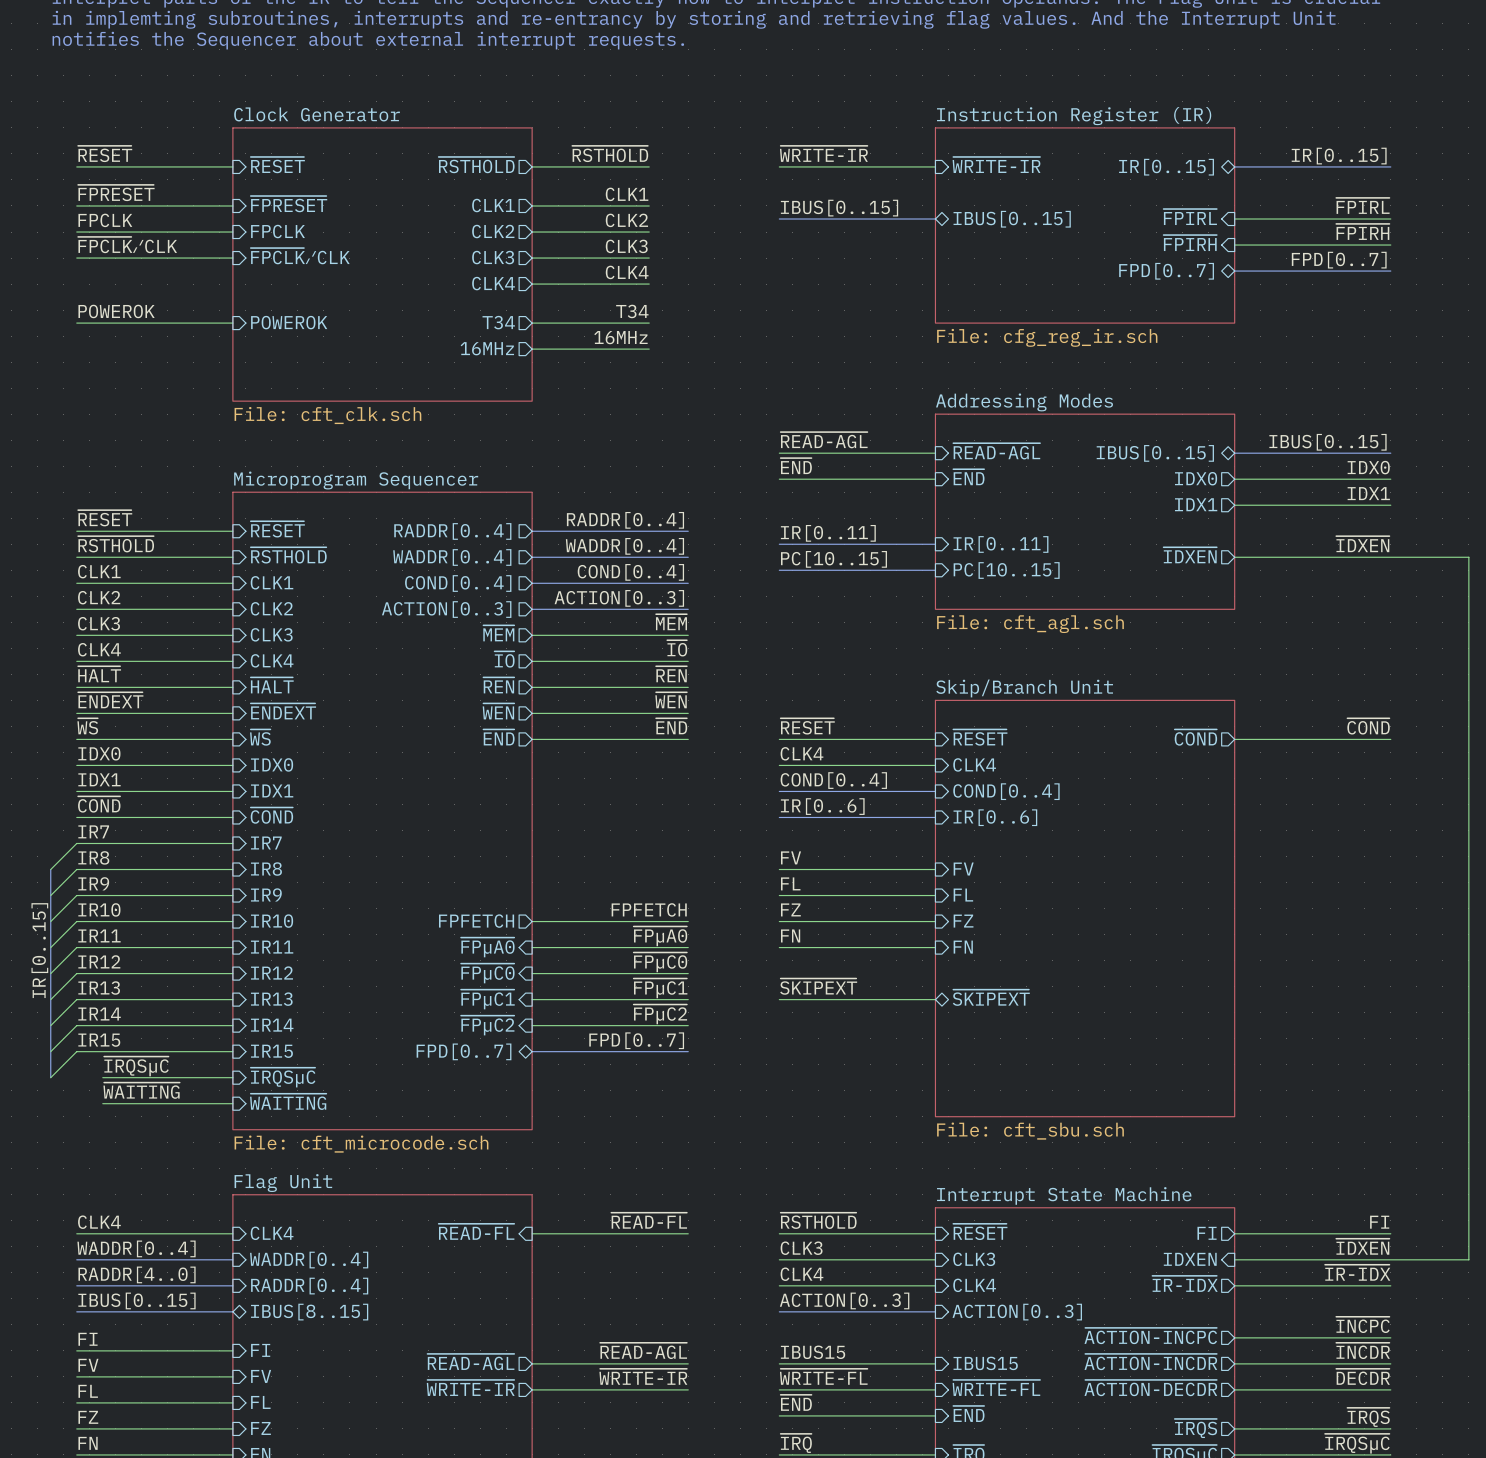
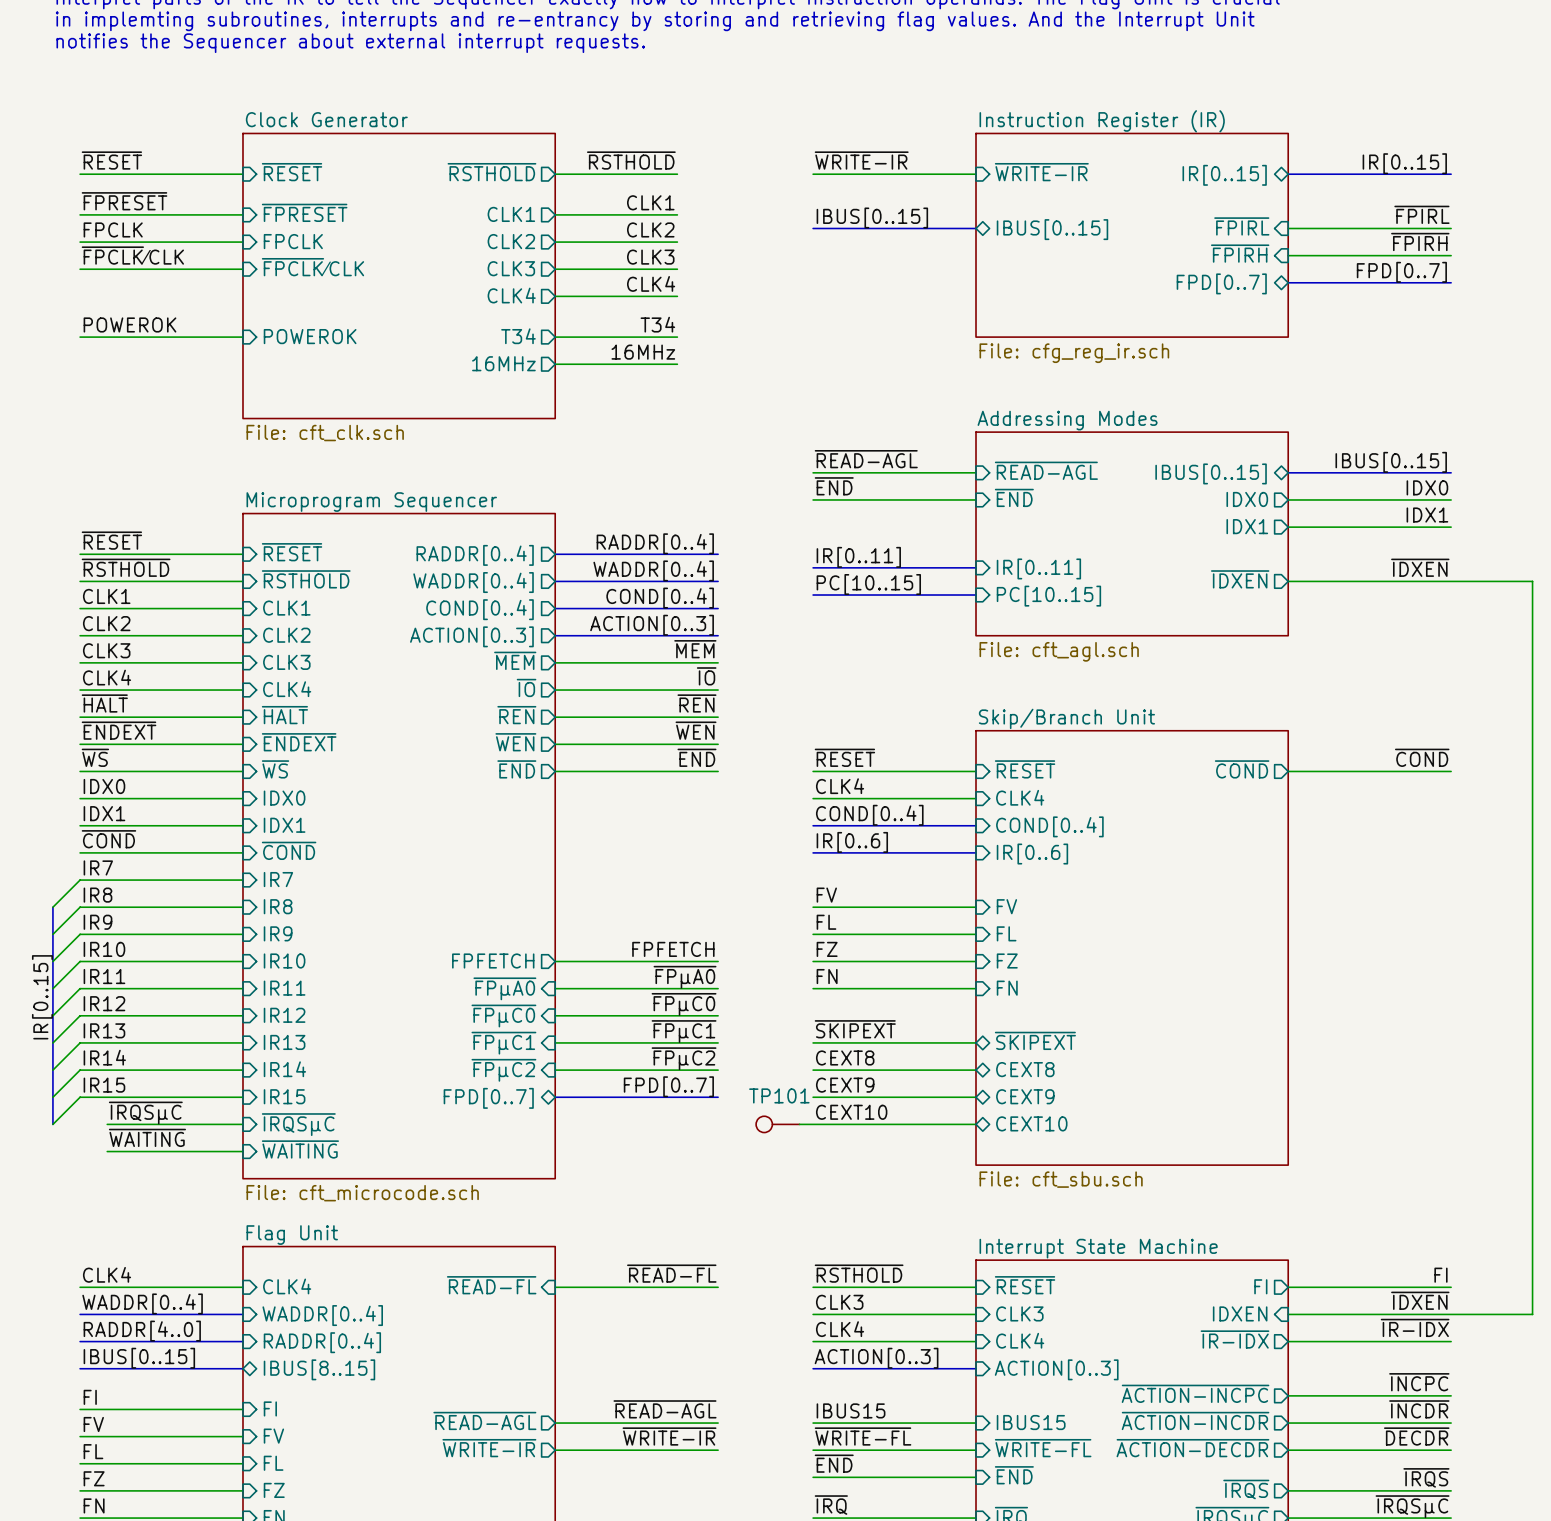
label: none -> CEXT8 (845, 1057)
wire: none -> (813, 1070) (976, 1070)
sheet pin: none -> CEXT8 (1025, 1069)
label: none -> CEXT9 (845, 1085)
wire: none -> (813, 1097) (976, 1097)
sheet pin: none -> CEXT9 (1025, 1096)
label: none -> CEXT10 (851, 1112)
TP101: none -> (777, 1124)
wire: none -> (799, 1124) (976, 1124)
sheet pin: none -> CEXT10 (1031, 1123)

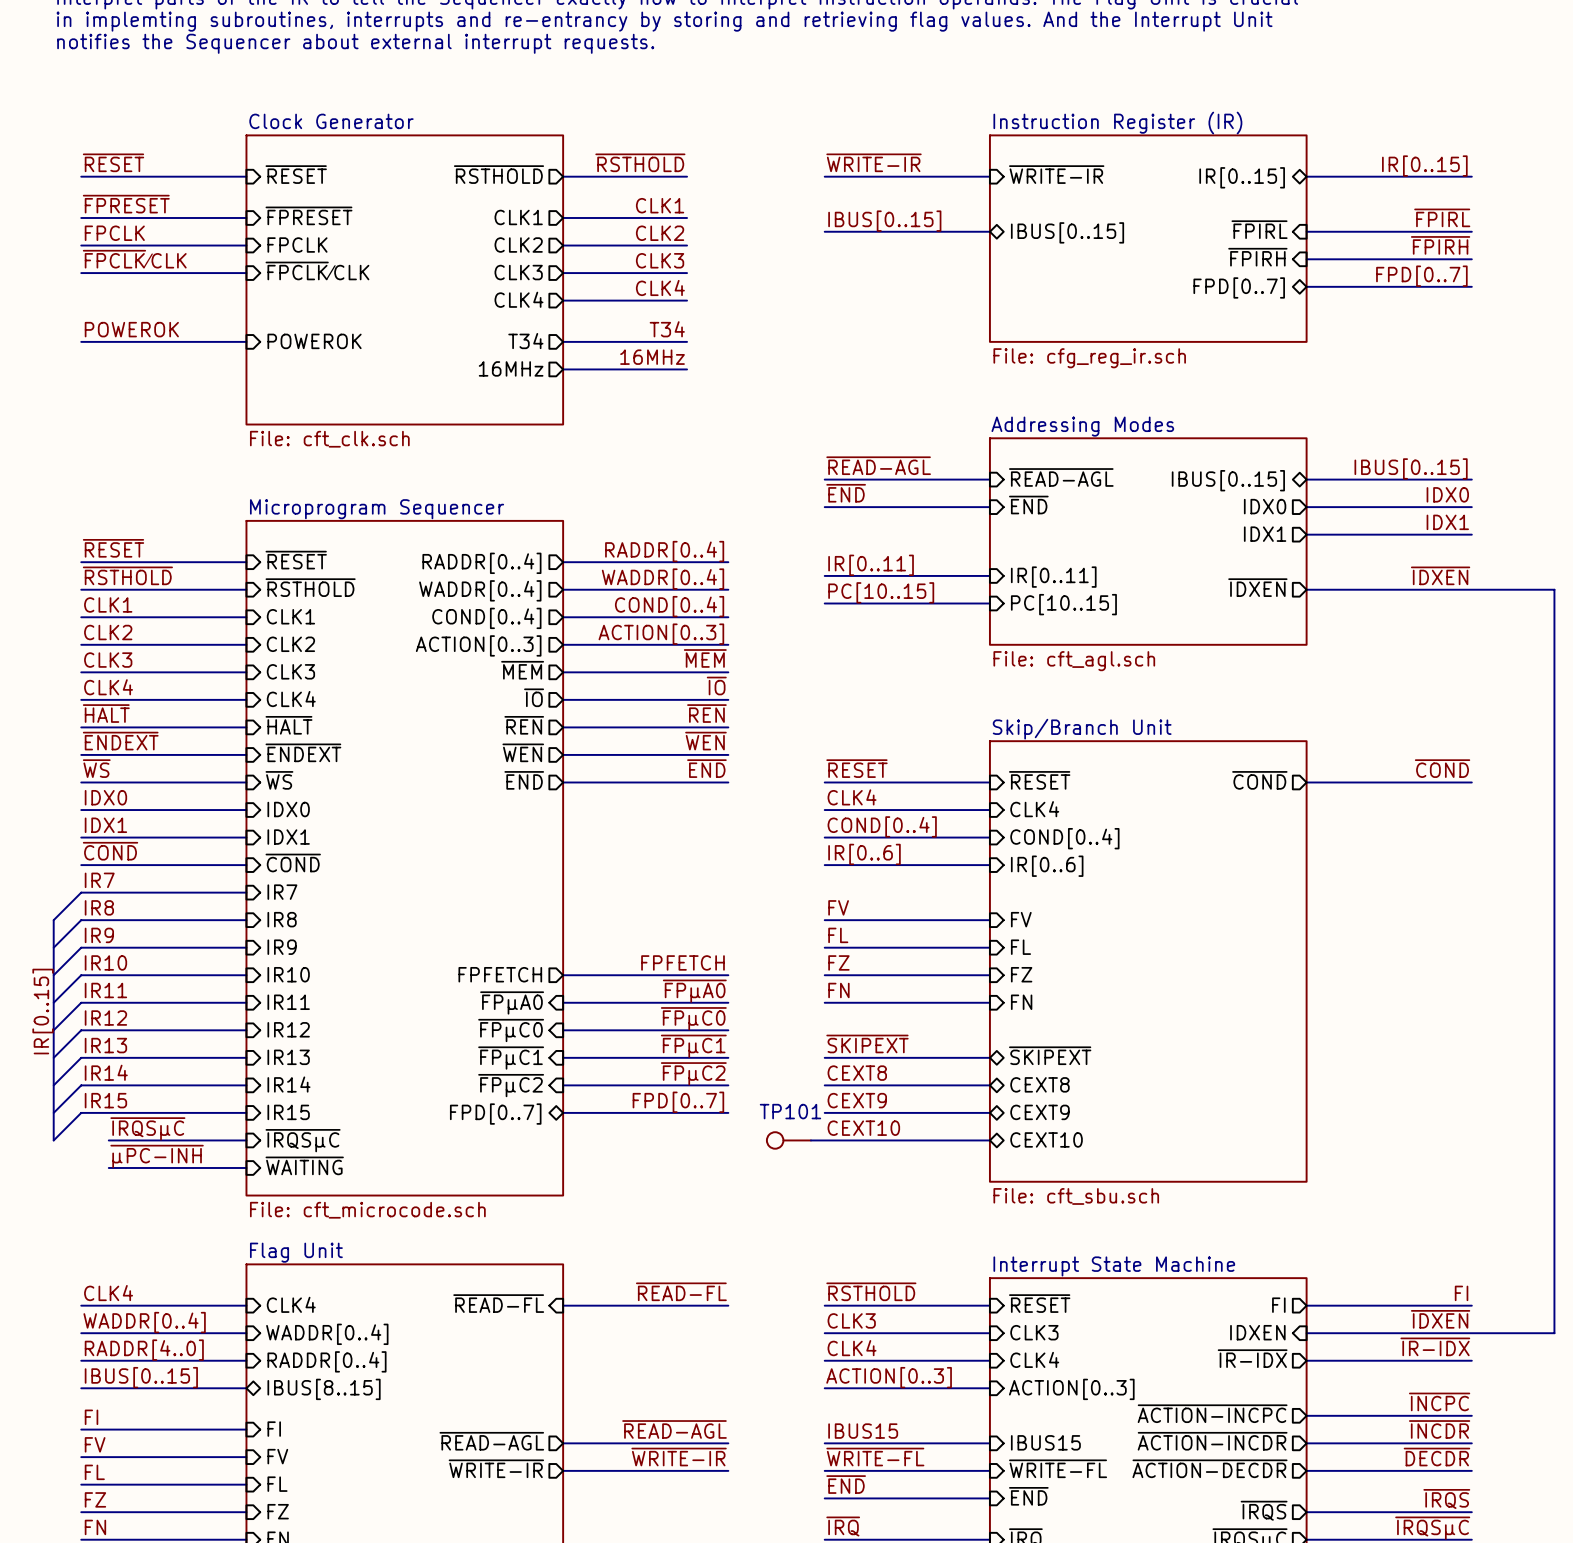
label: ~{WAITING} (147, 1137) -> ~{µPC-INH} (157, 1156)

